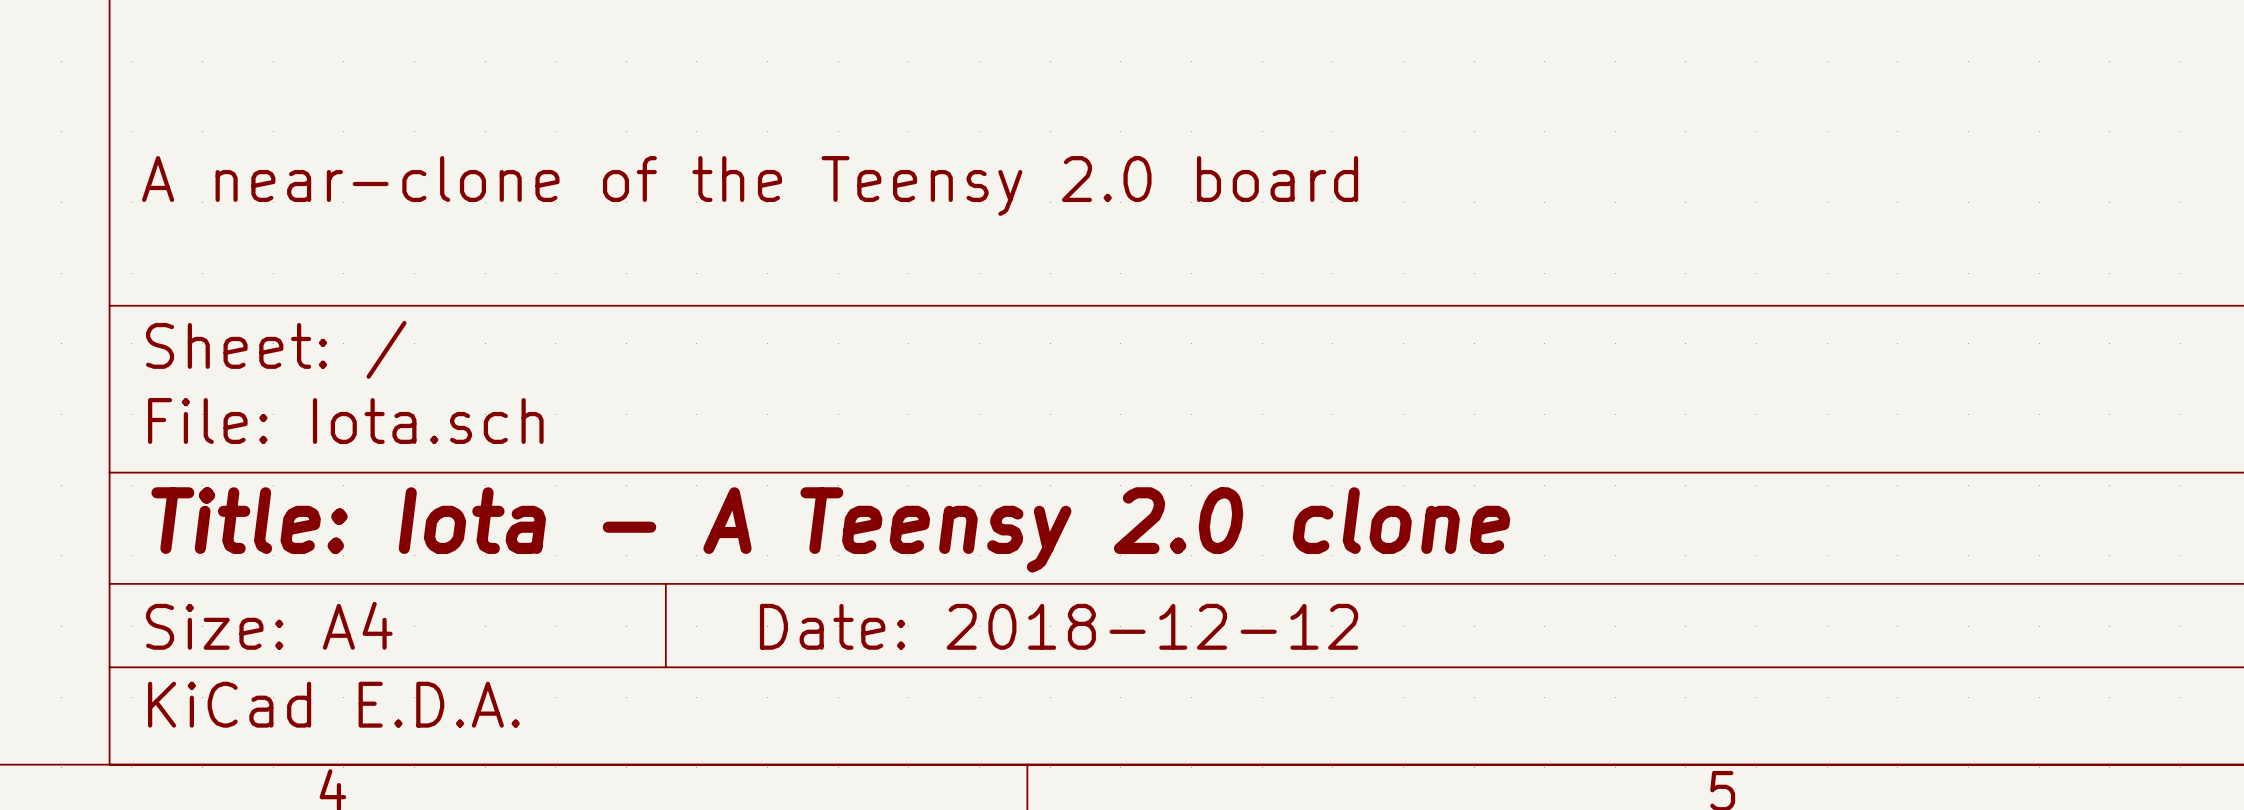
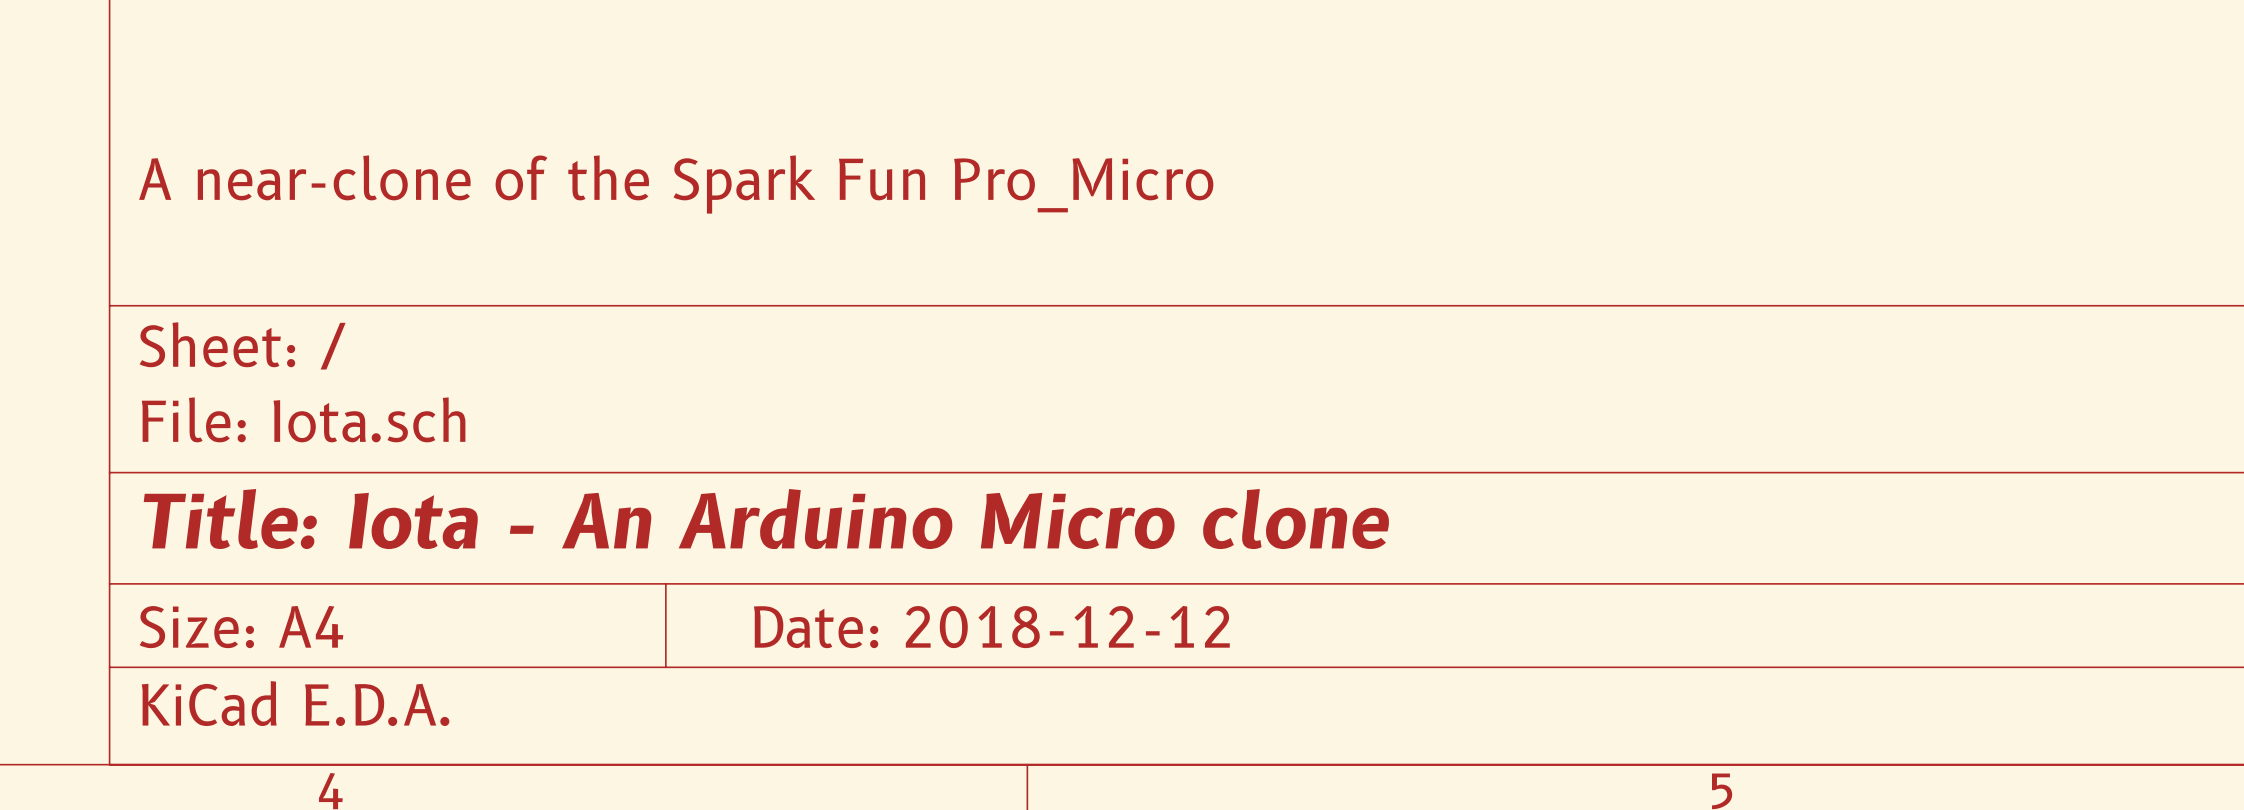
title block: A near-clone of the Teensy 2.0 board (750, 185) -> A near-clone of the Spark Fun Pro_Micro (676, 184)
title block: Title: Iota - A Teensy 2.0 clone (830, 529) -> Title: Iota - An Arduino Micro clone (766, 519)

